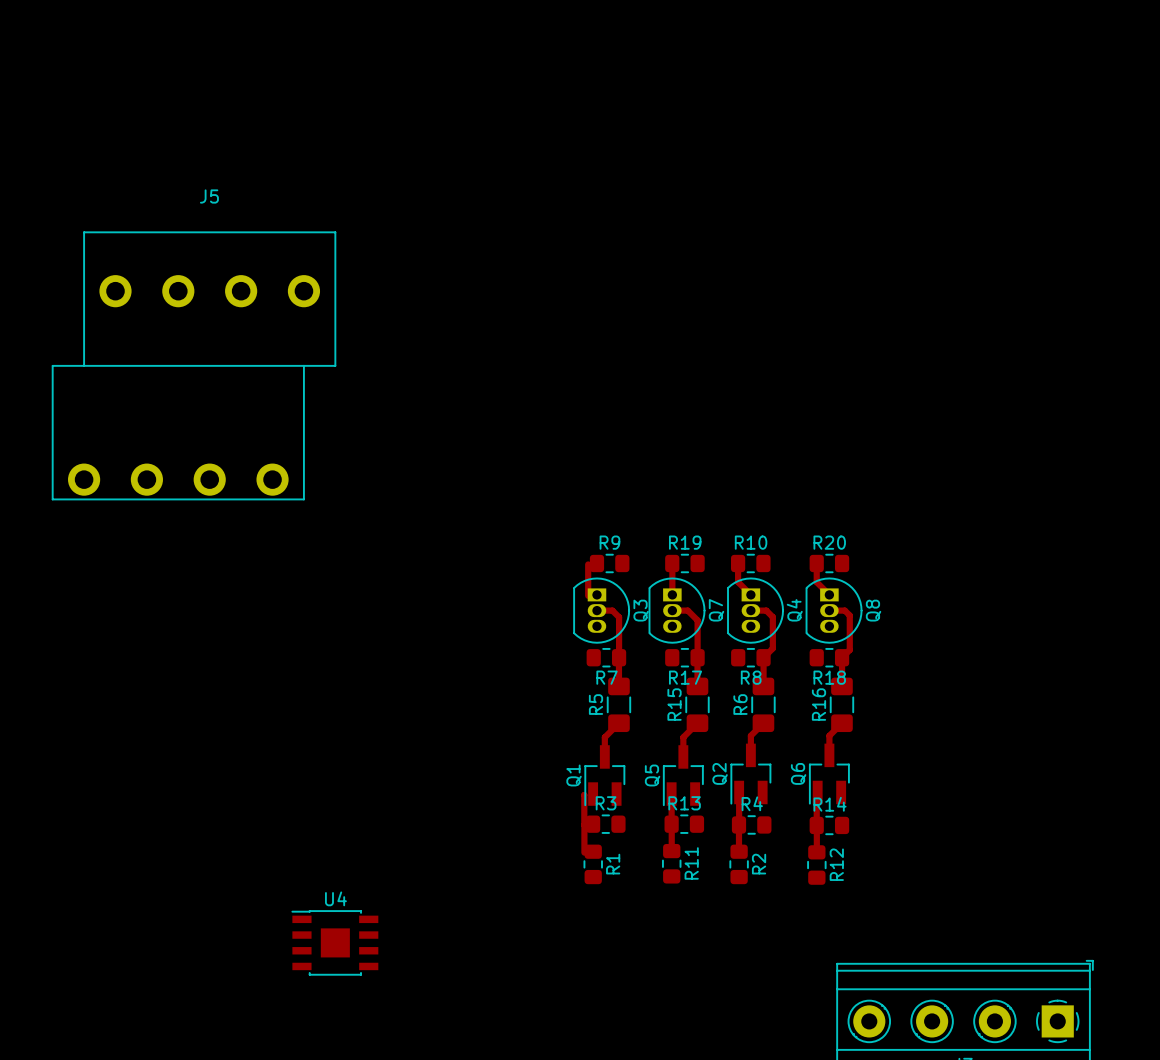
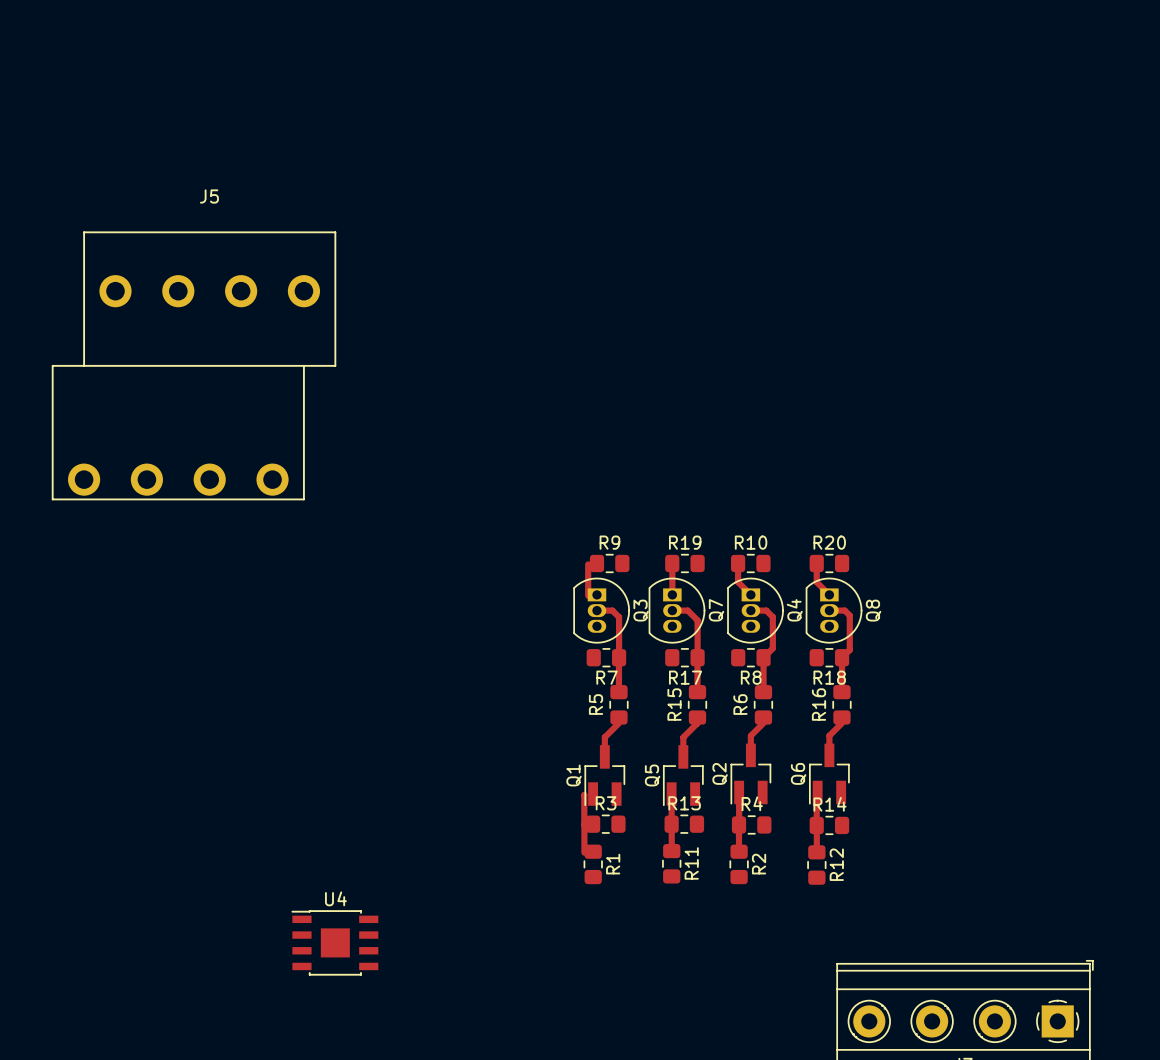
R5 footprint: [606, 677, 631, 733] -> [609, 685, 629, 725]
R15 footprint: [685, 677, 710, 733] -> [687, 685, 708, 725]
R6 footprint: [751, 677, 776, 733] -> [753, 685, 773, 725]
R16 footprint: [829, 677, 854, 733] -> [832, 685, 852, 725]

